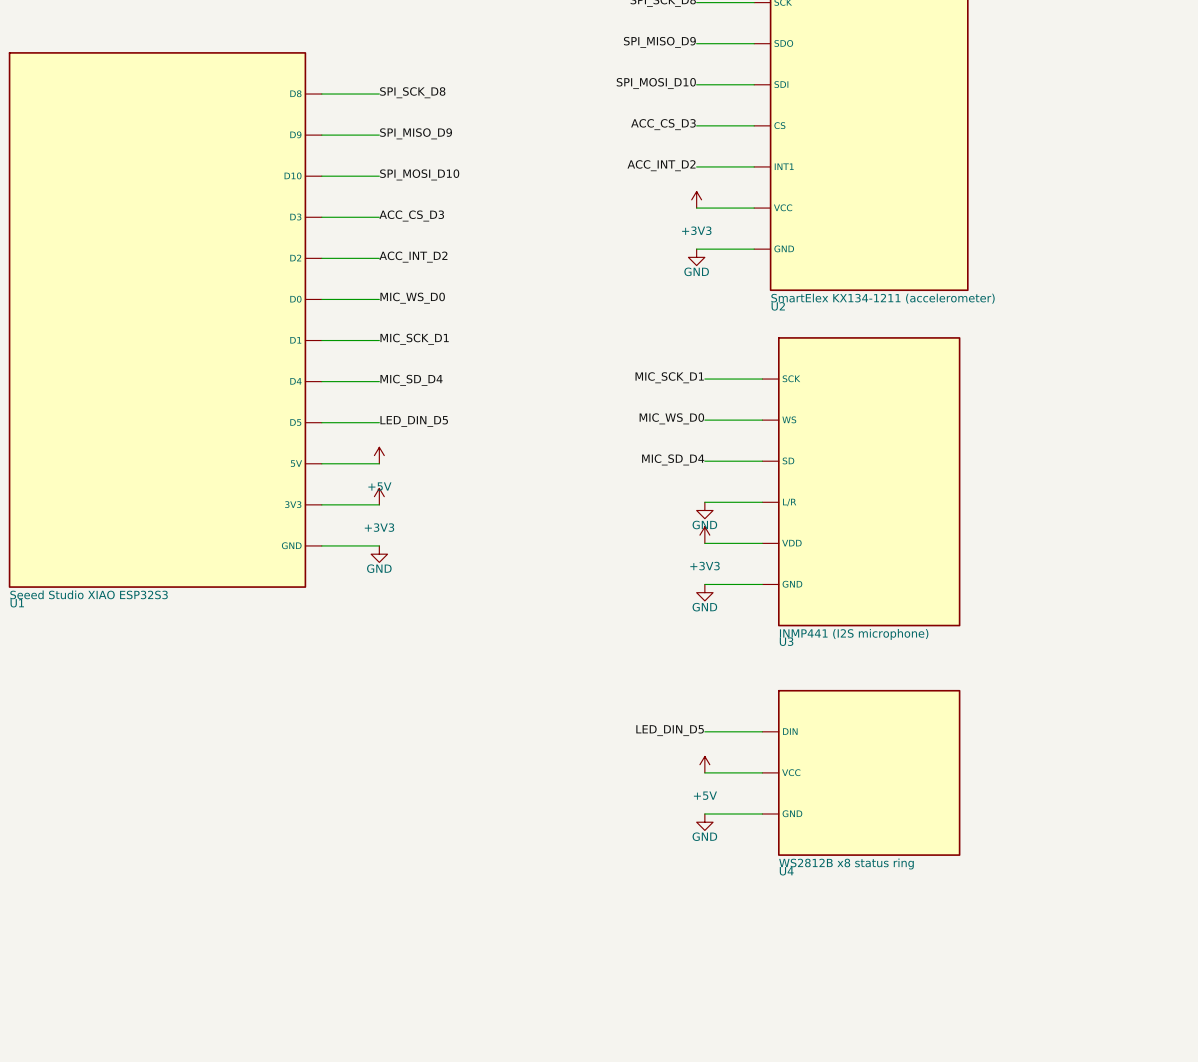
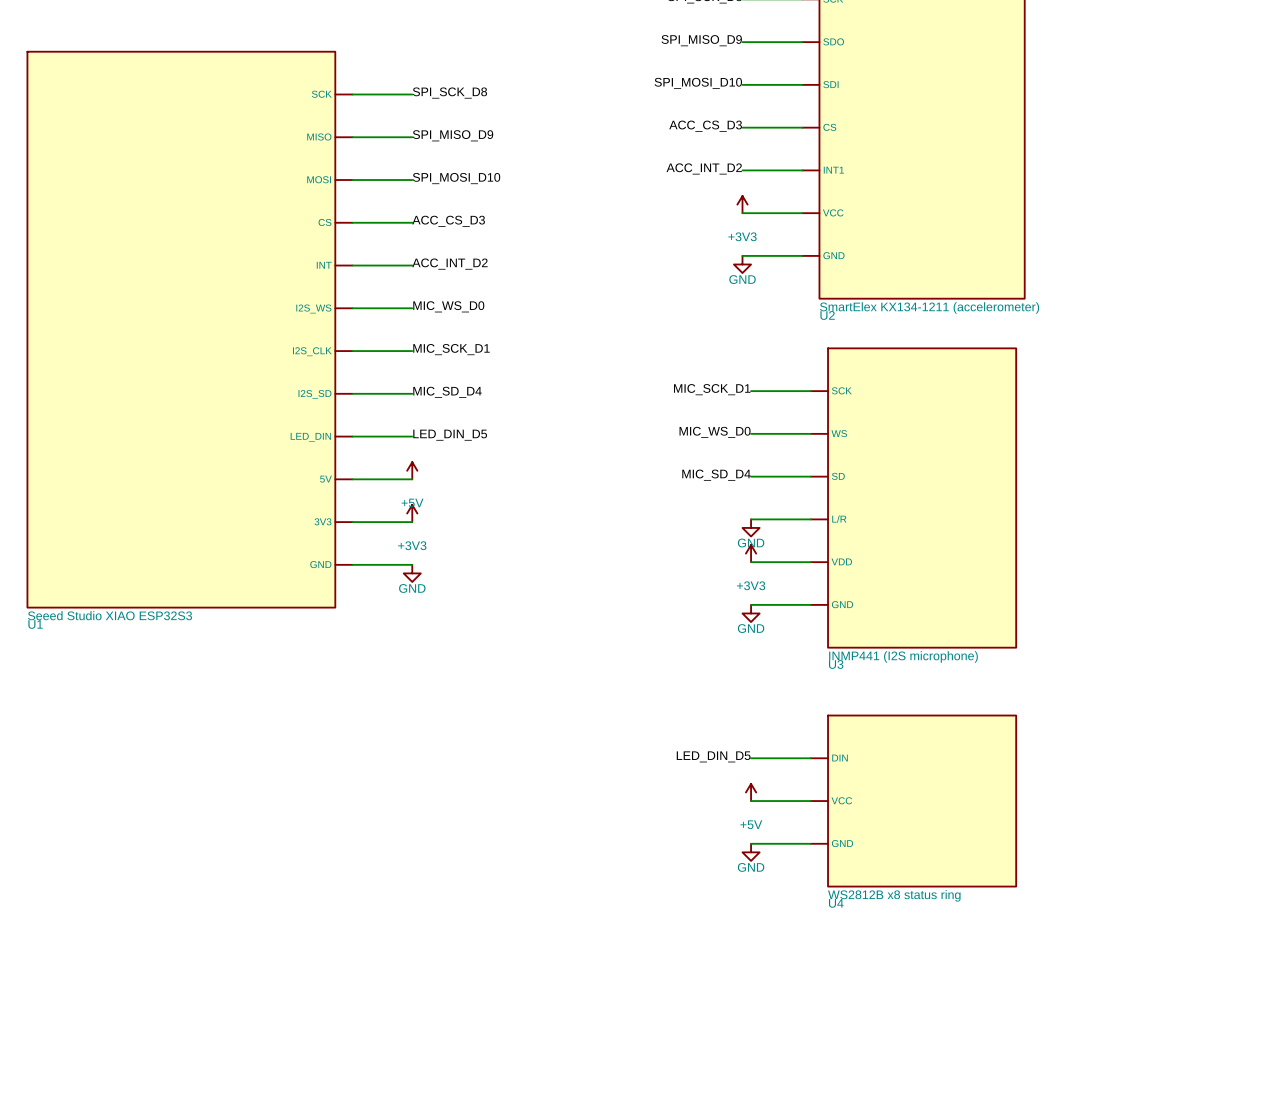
U1 symbol: [8, 52, 322, 588] -> [26, 50, 353, 609]

